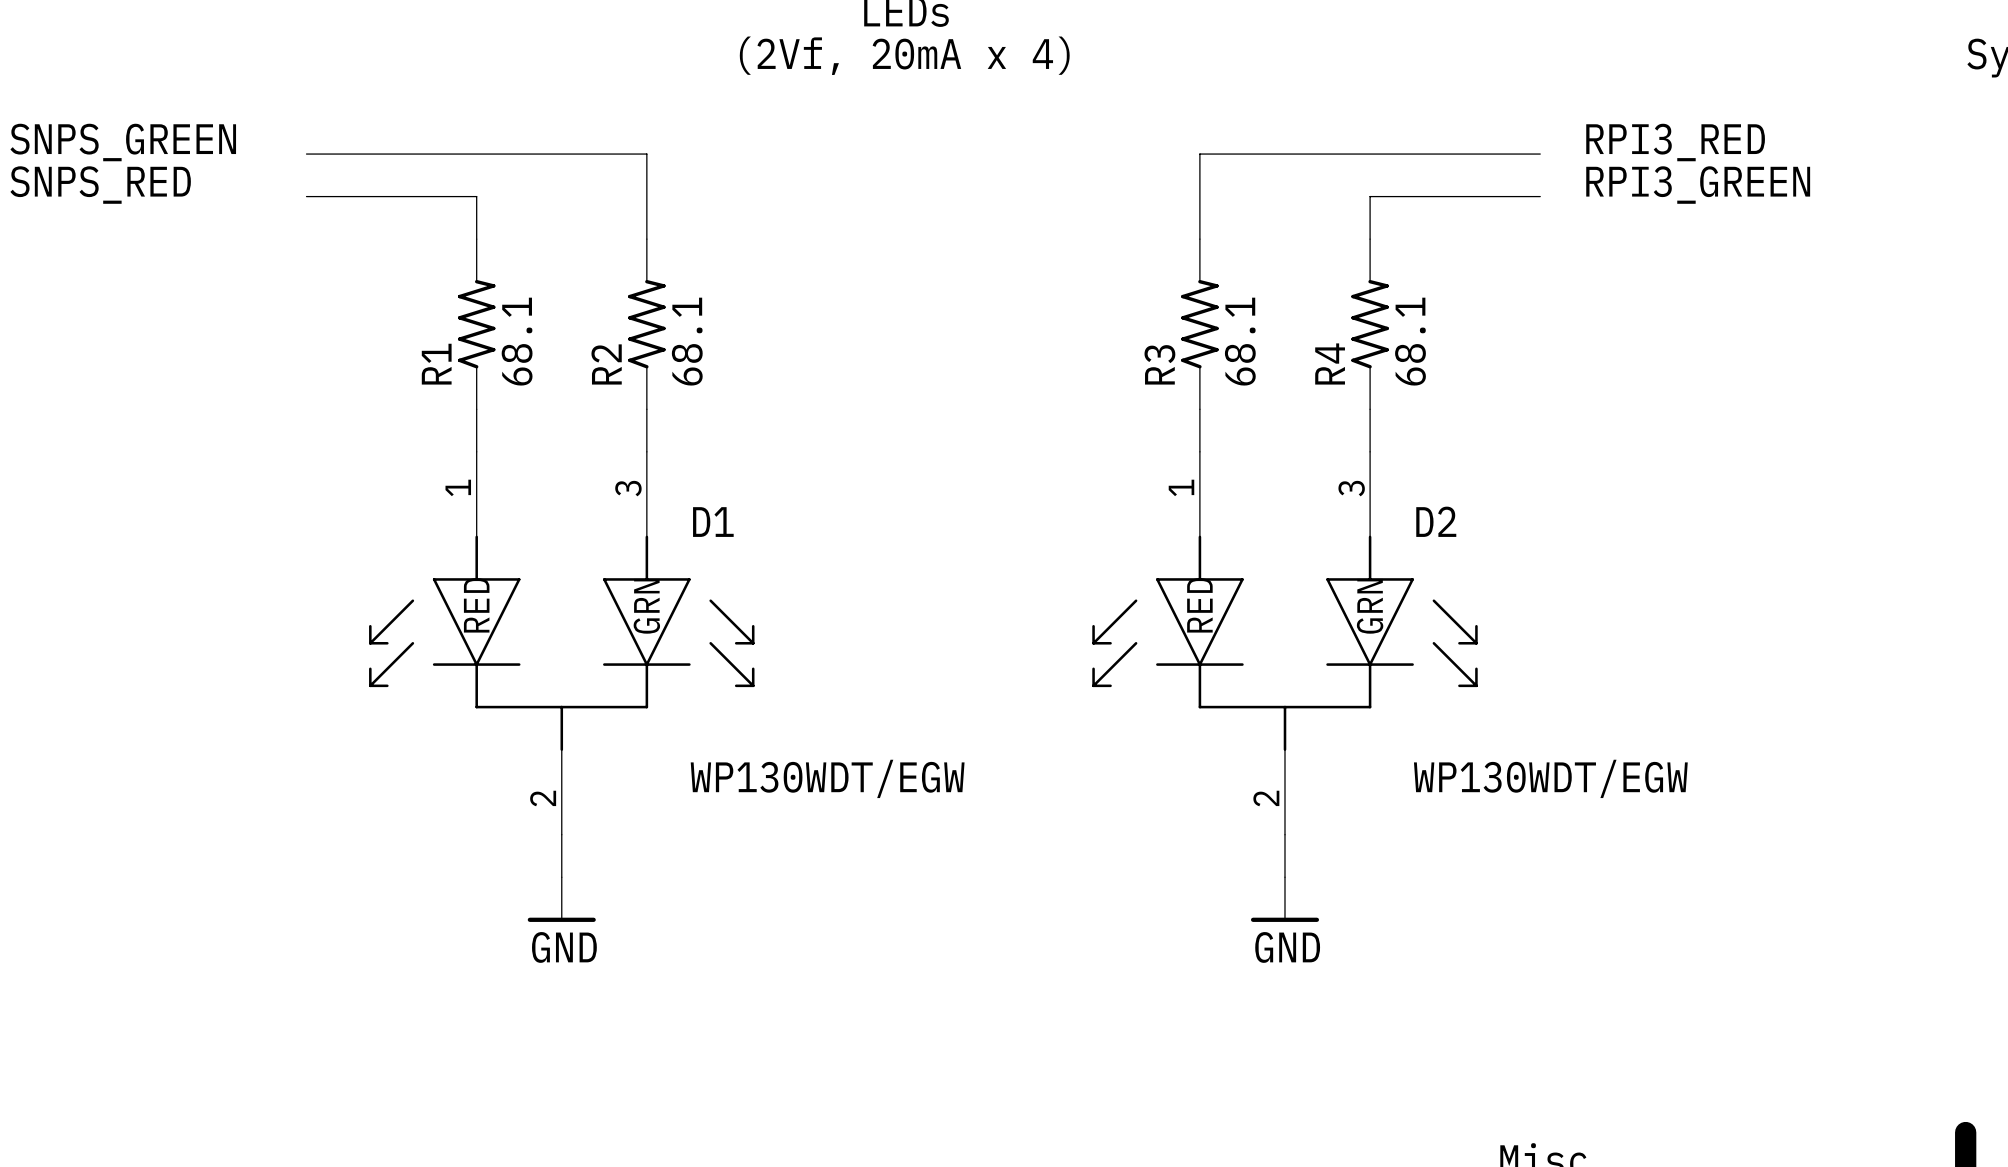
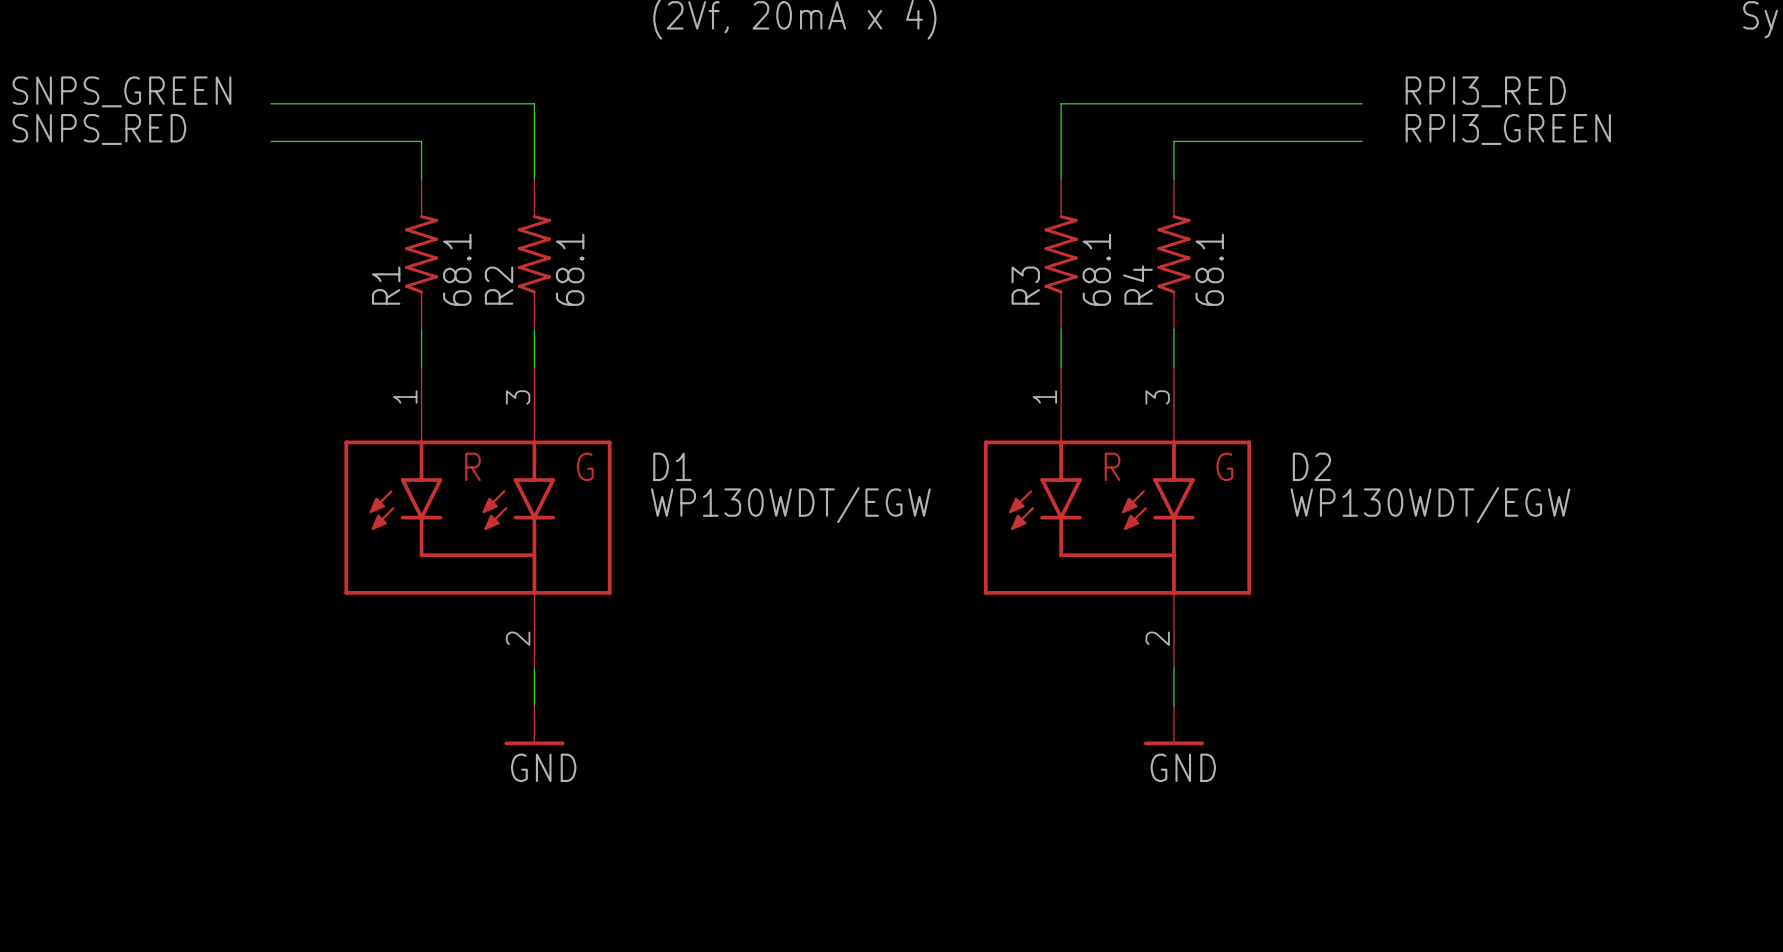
wire: (604, 154) (646, 154) (646, 239) -> (534, 103) (534, 179)
wire: (1370, 196) (1370, 239) -> (1211, 141) (1173, 141) (1173, 179)
R2 position: (646, 324) -> (534, 254)
R4 position: (1370, 324) -> (1173, 254)
wire: (646, 409) (646, 451) -> (534, 329) (534, 367)
wire: (1370, 409) (1370, 451) -> (1173, 329) (1173, 367)
D1 symbol: [369, 451, 755, 835] -> [344, 367, 612, 669]
D2 symbol: [1092, 451, 1478, 835] -> [983, 367, 1252, 669]
D2 name position: D2 (1436, 521) -> D2 (1311, 466)
D1 name position: D1 (713, 522) -> D1 (672, 466)
D1 value position: WP130WDT/EGW (827, 778) -> WP130WDT/EGW (790, 505)
D2 value position: WP130WDT/EGW (1550, 778) -> WP130WDT/EGW (1430, 505)
wire: (561, 834) (561, 877) -> (534, 668) (534, 705)
wire: (1284, 834) (1284, 877) -> (1173, 668) (1173, 705)
power symbol position: GND (561, 899) -> GND (534, 725)
power symbol position: GND (1284, 899) -> GND (1173, 725)

